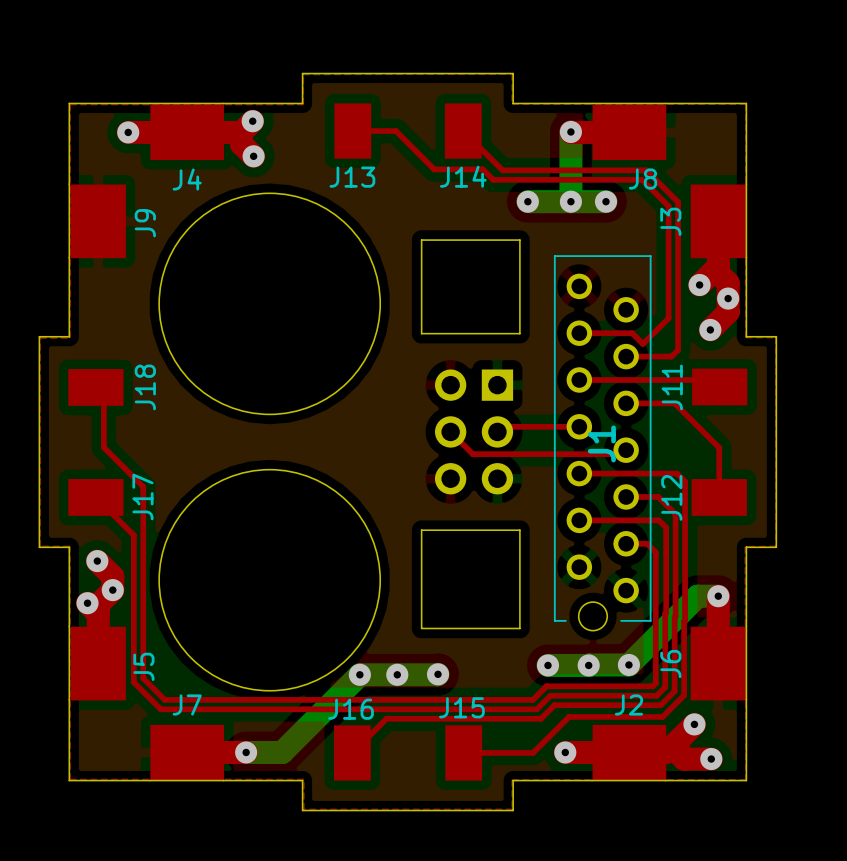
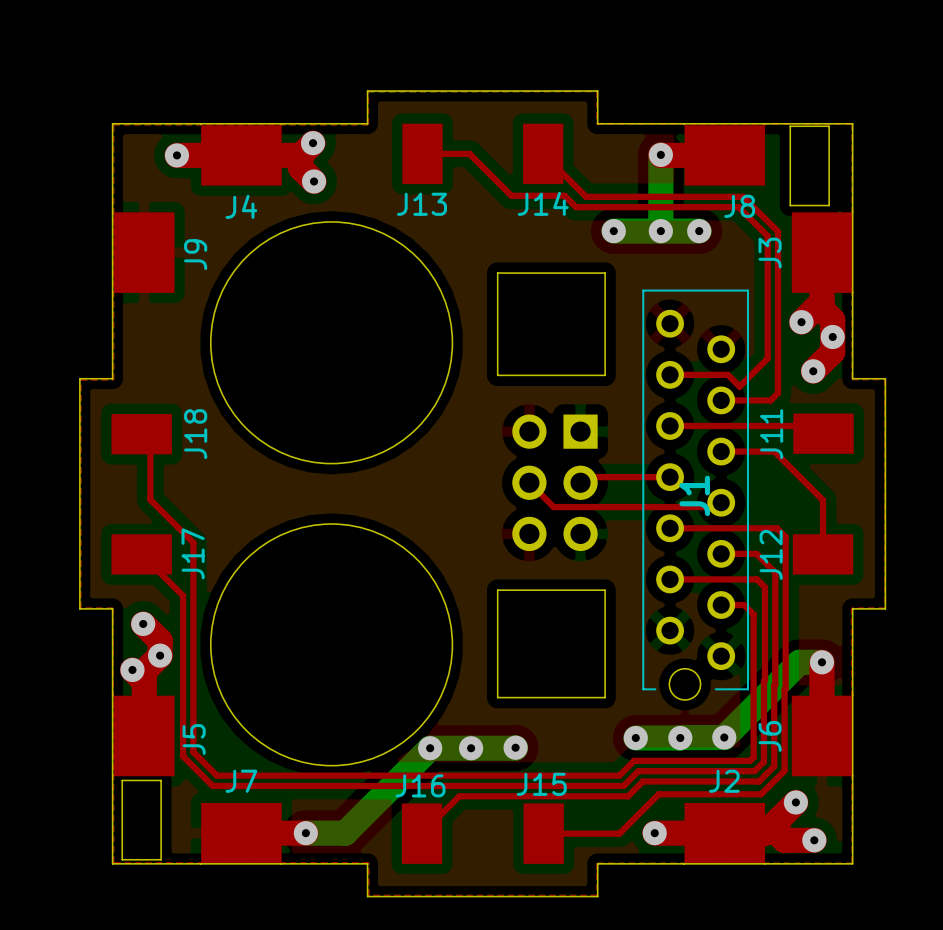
board edge: none -> (790, 126) (829, 126) (829, 205) (790, 205) (790, 126)
board edge: none -> (122, 780) (122, 859) (161, 859) (161, 780) (122, 780)

